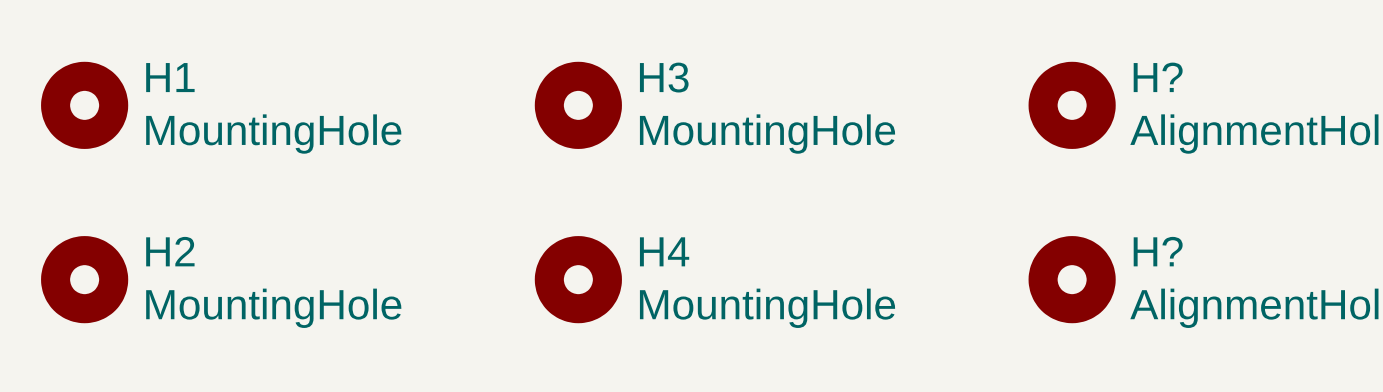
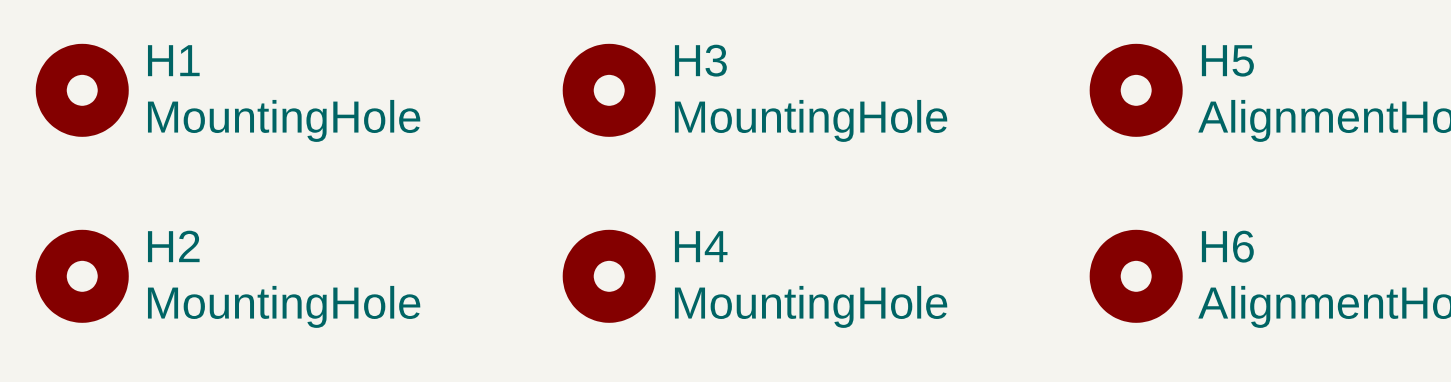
H? name: H? (1158, 77) -> H5 (1227, 60)
H? name: H? (1158, 251) -> H6 (1227, 246)

